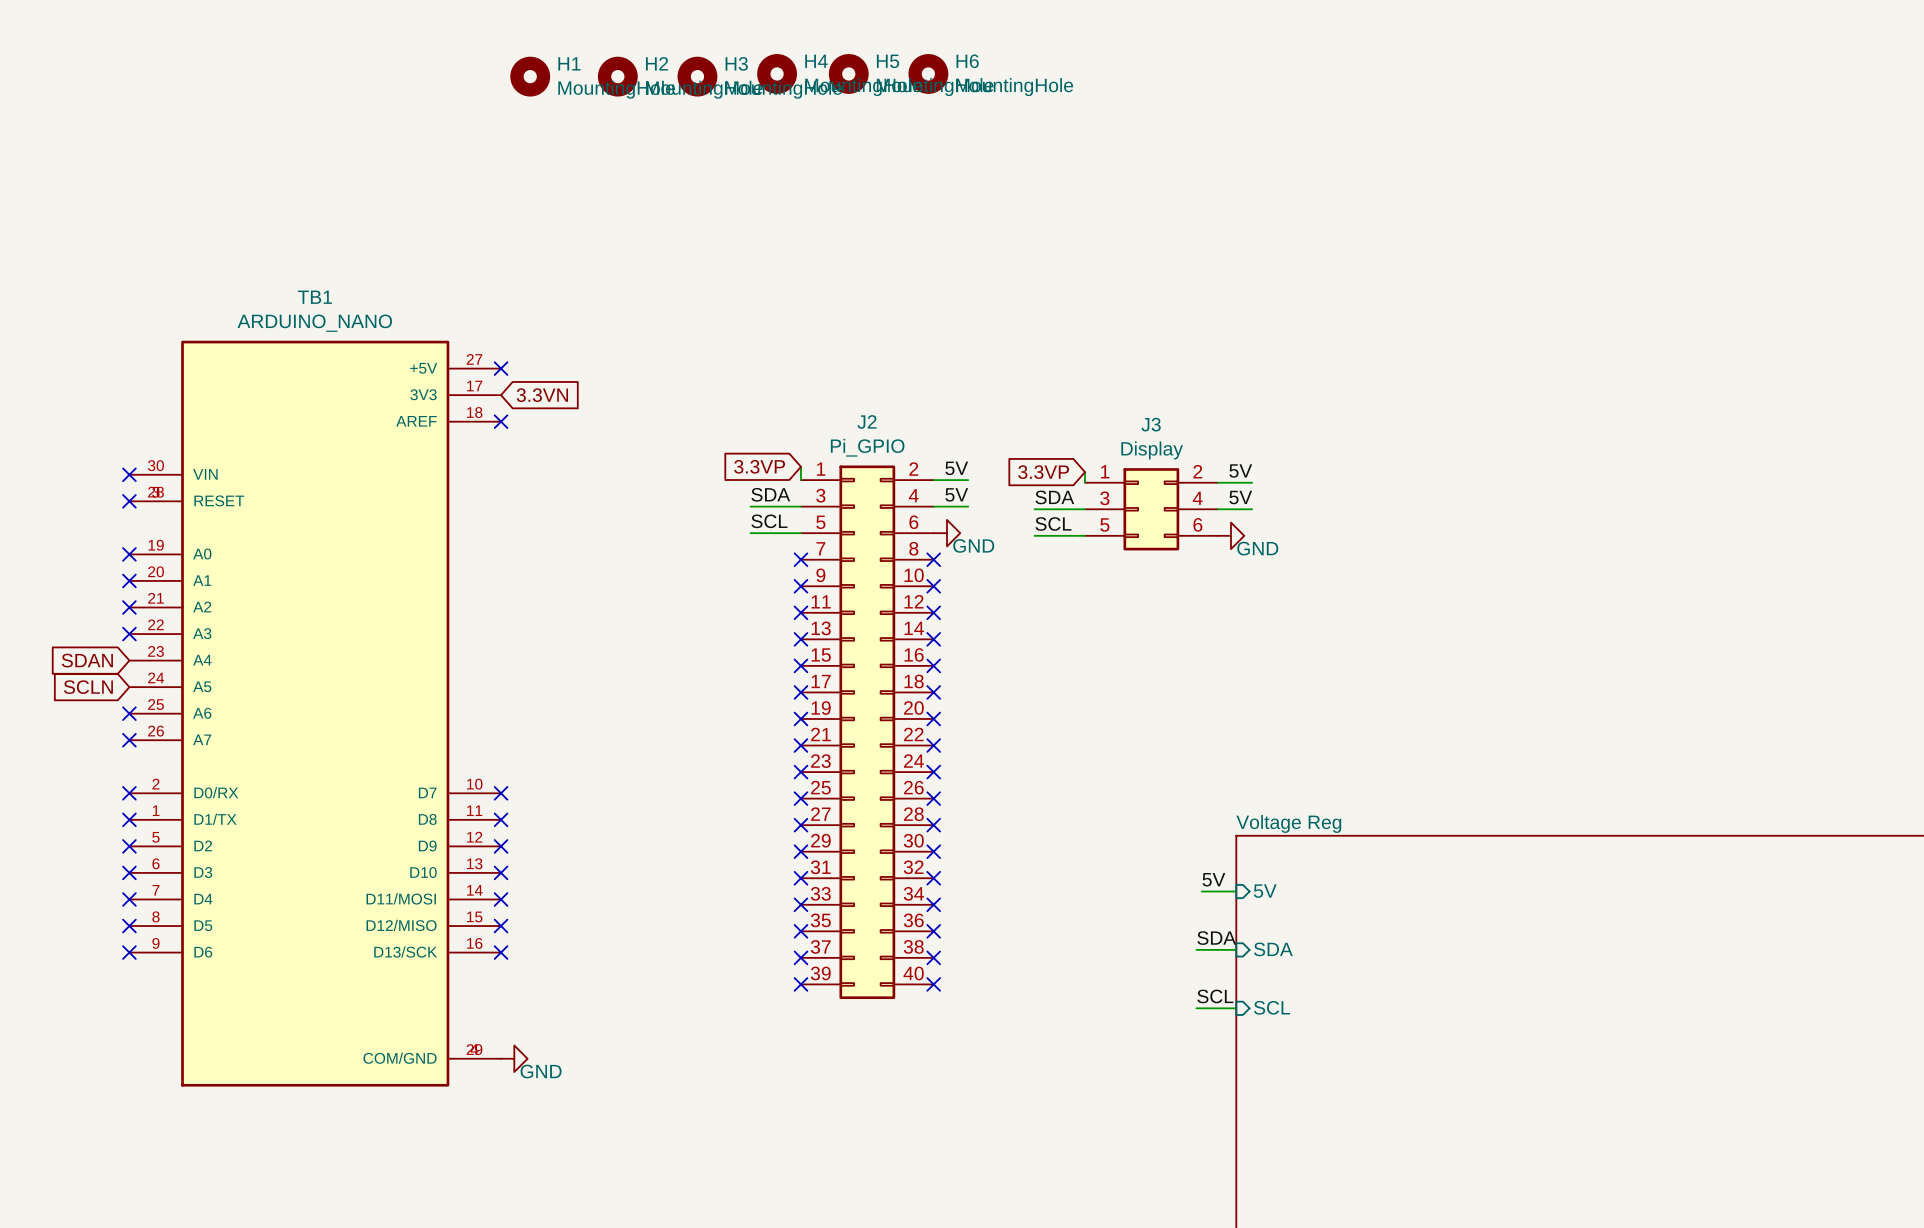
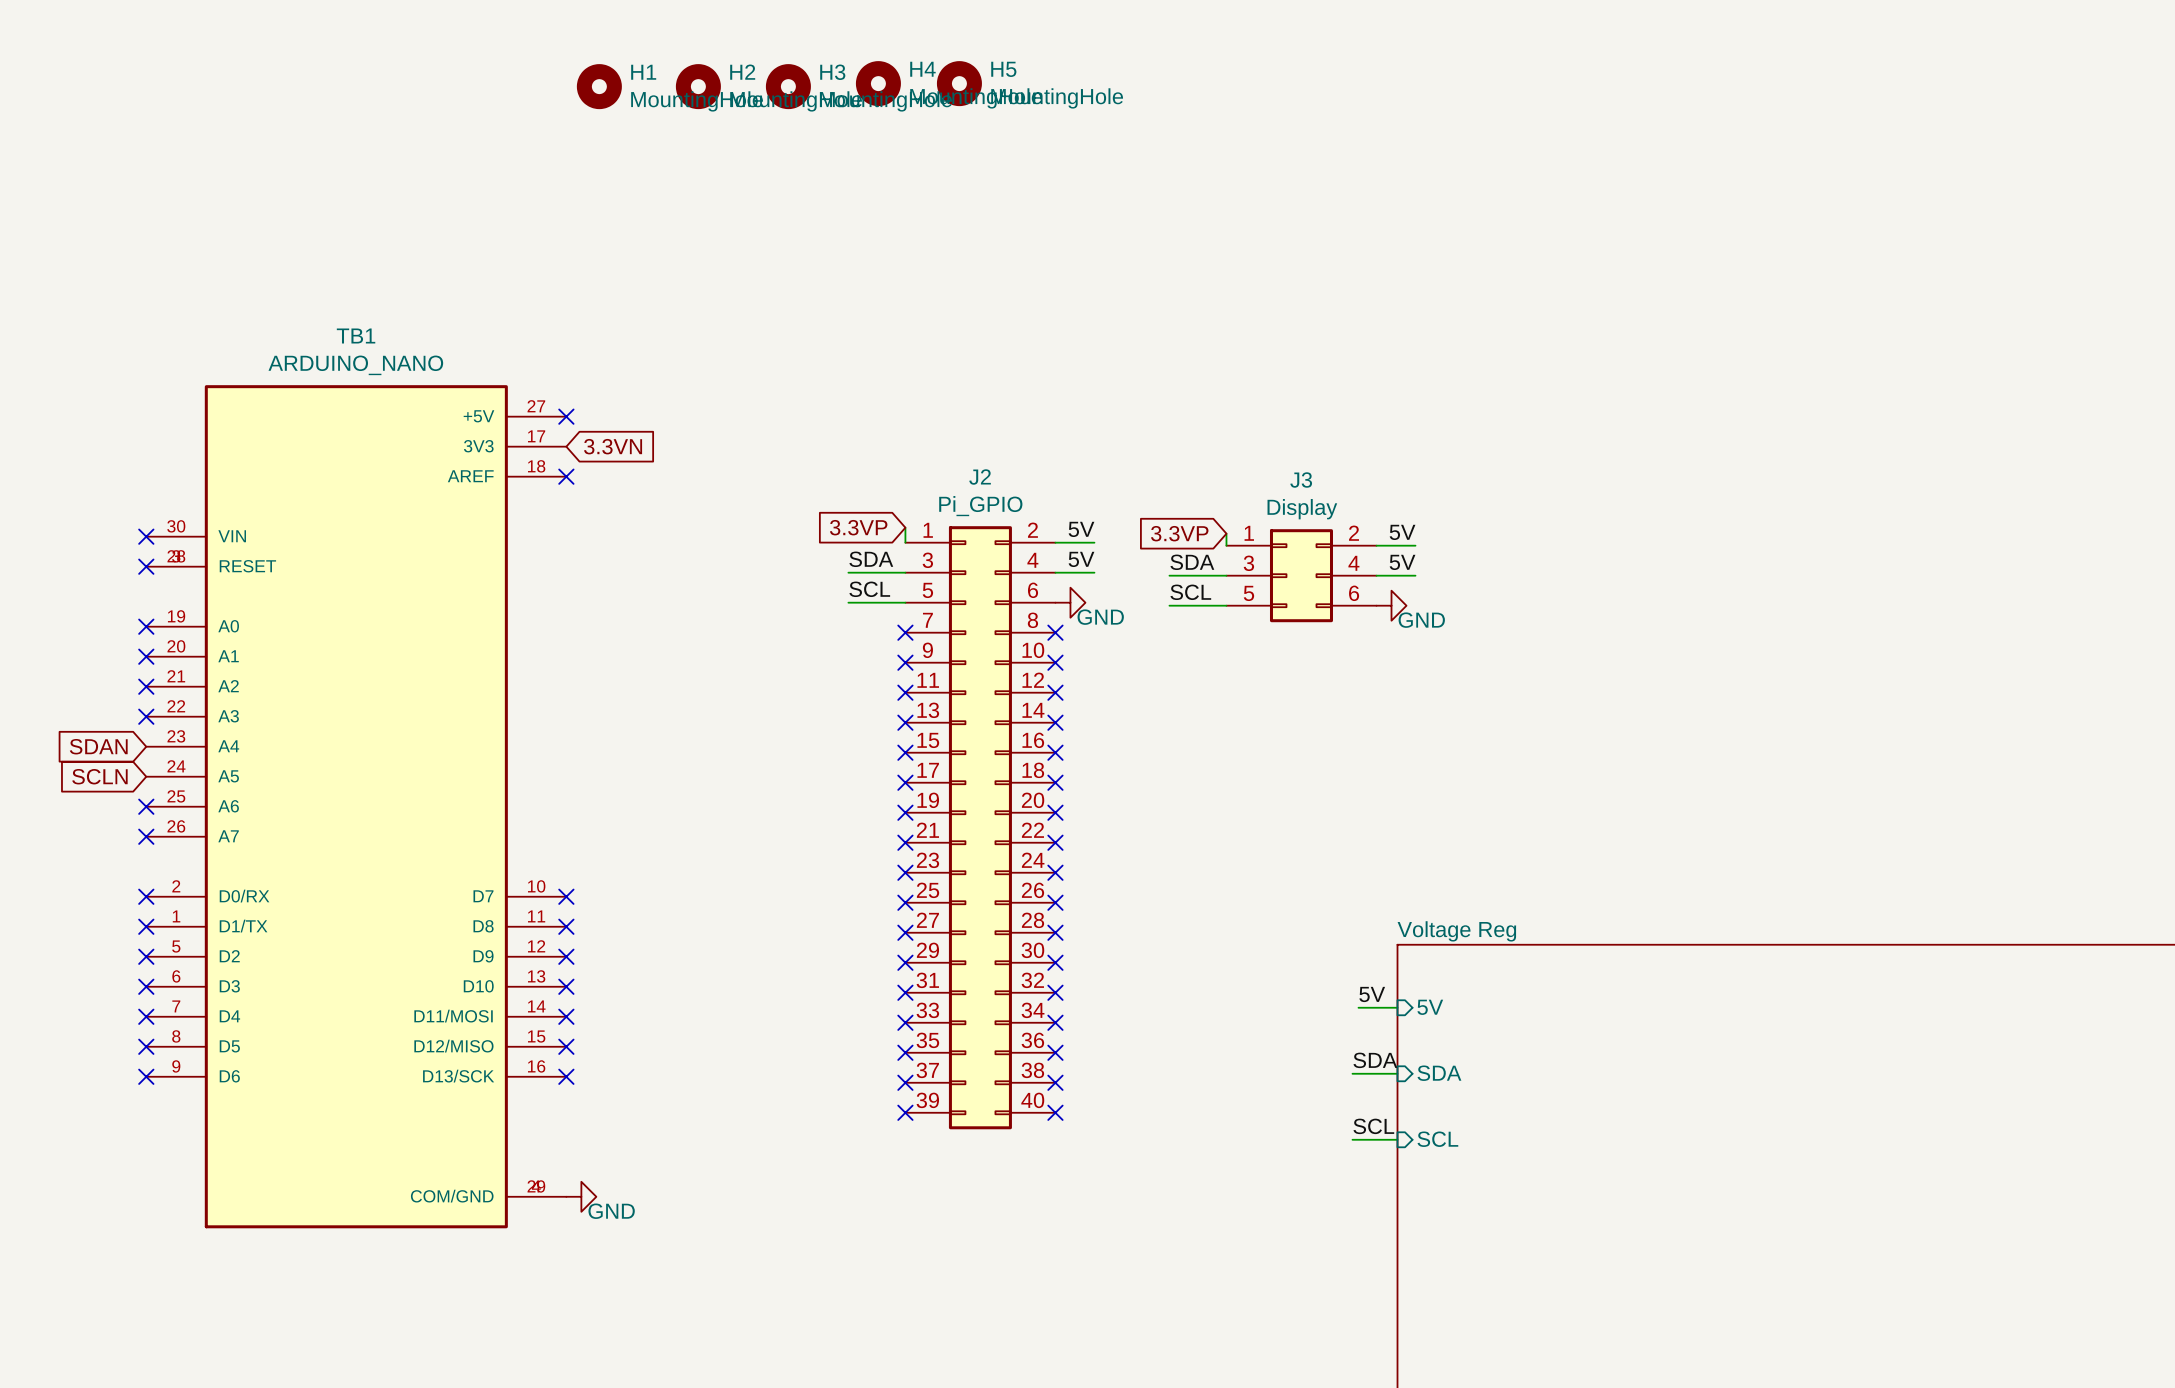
H6: MountingHole (928, 73) -> none

